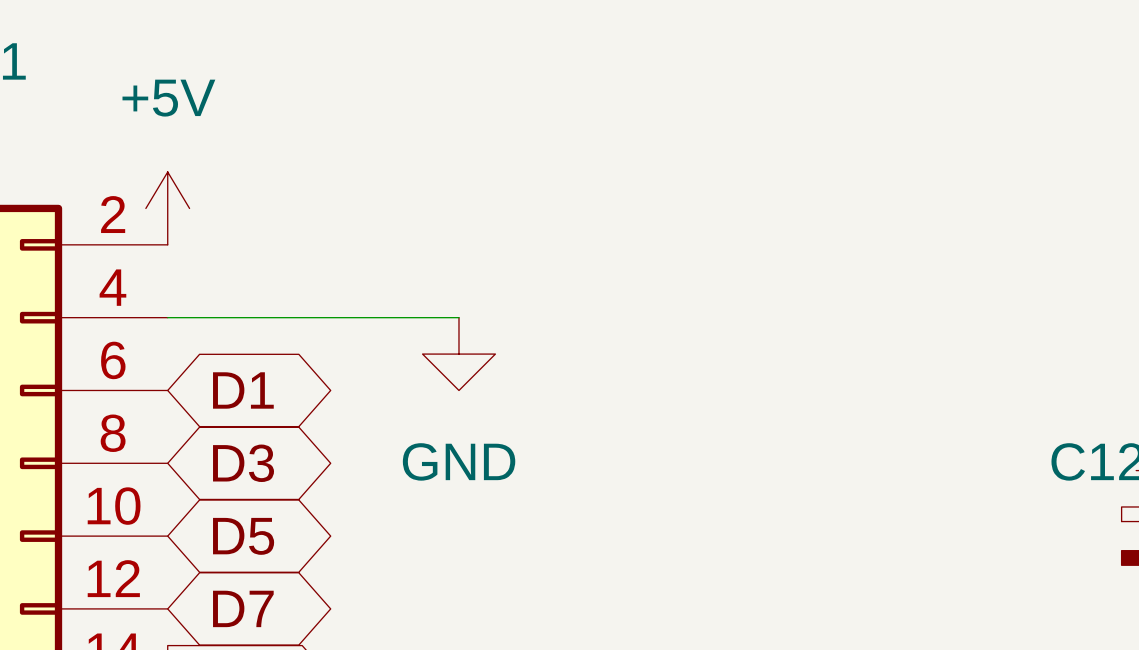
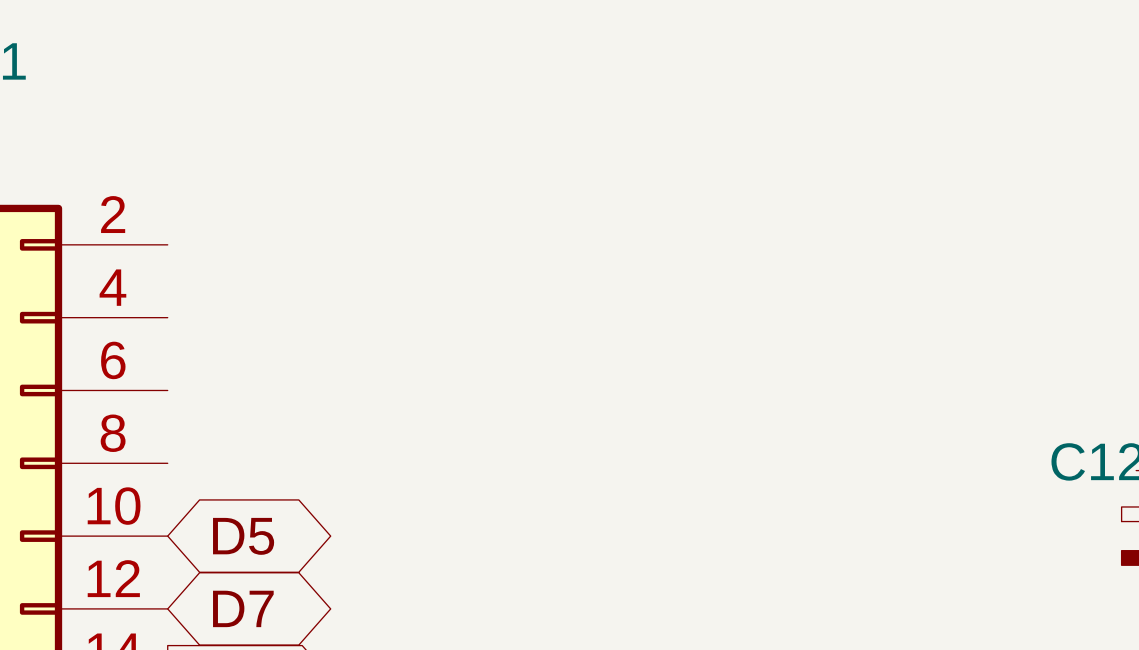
power symbol: +5V (167, 208) -> none
wire: (167, 317) (458, 317) -> none
power symbol: GND (458, 354) -> none
global label: D1 (243, 390) -> none
global label: D3 (243, 463) -> none

